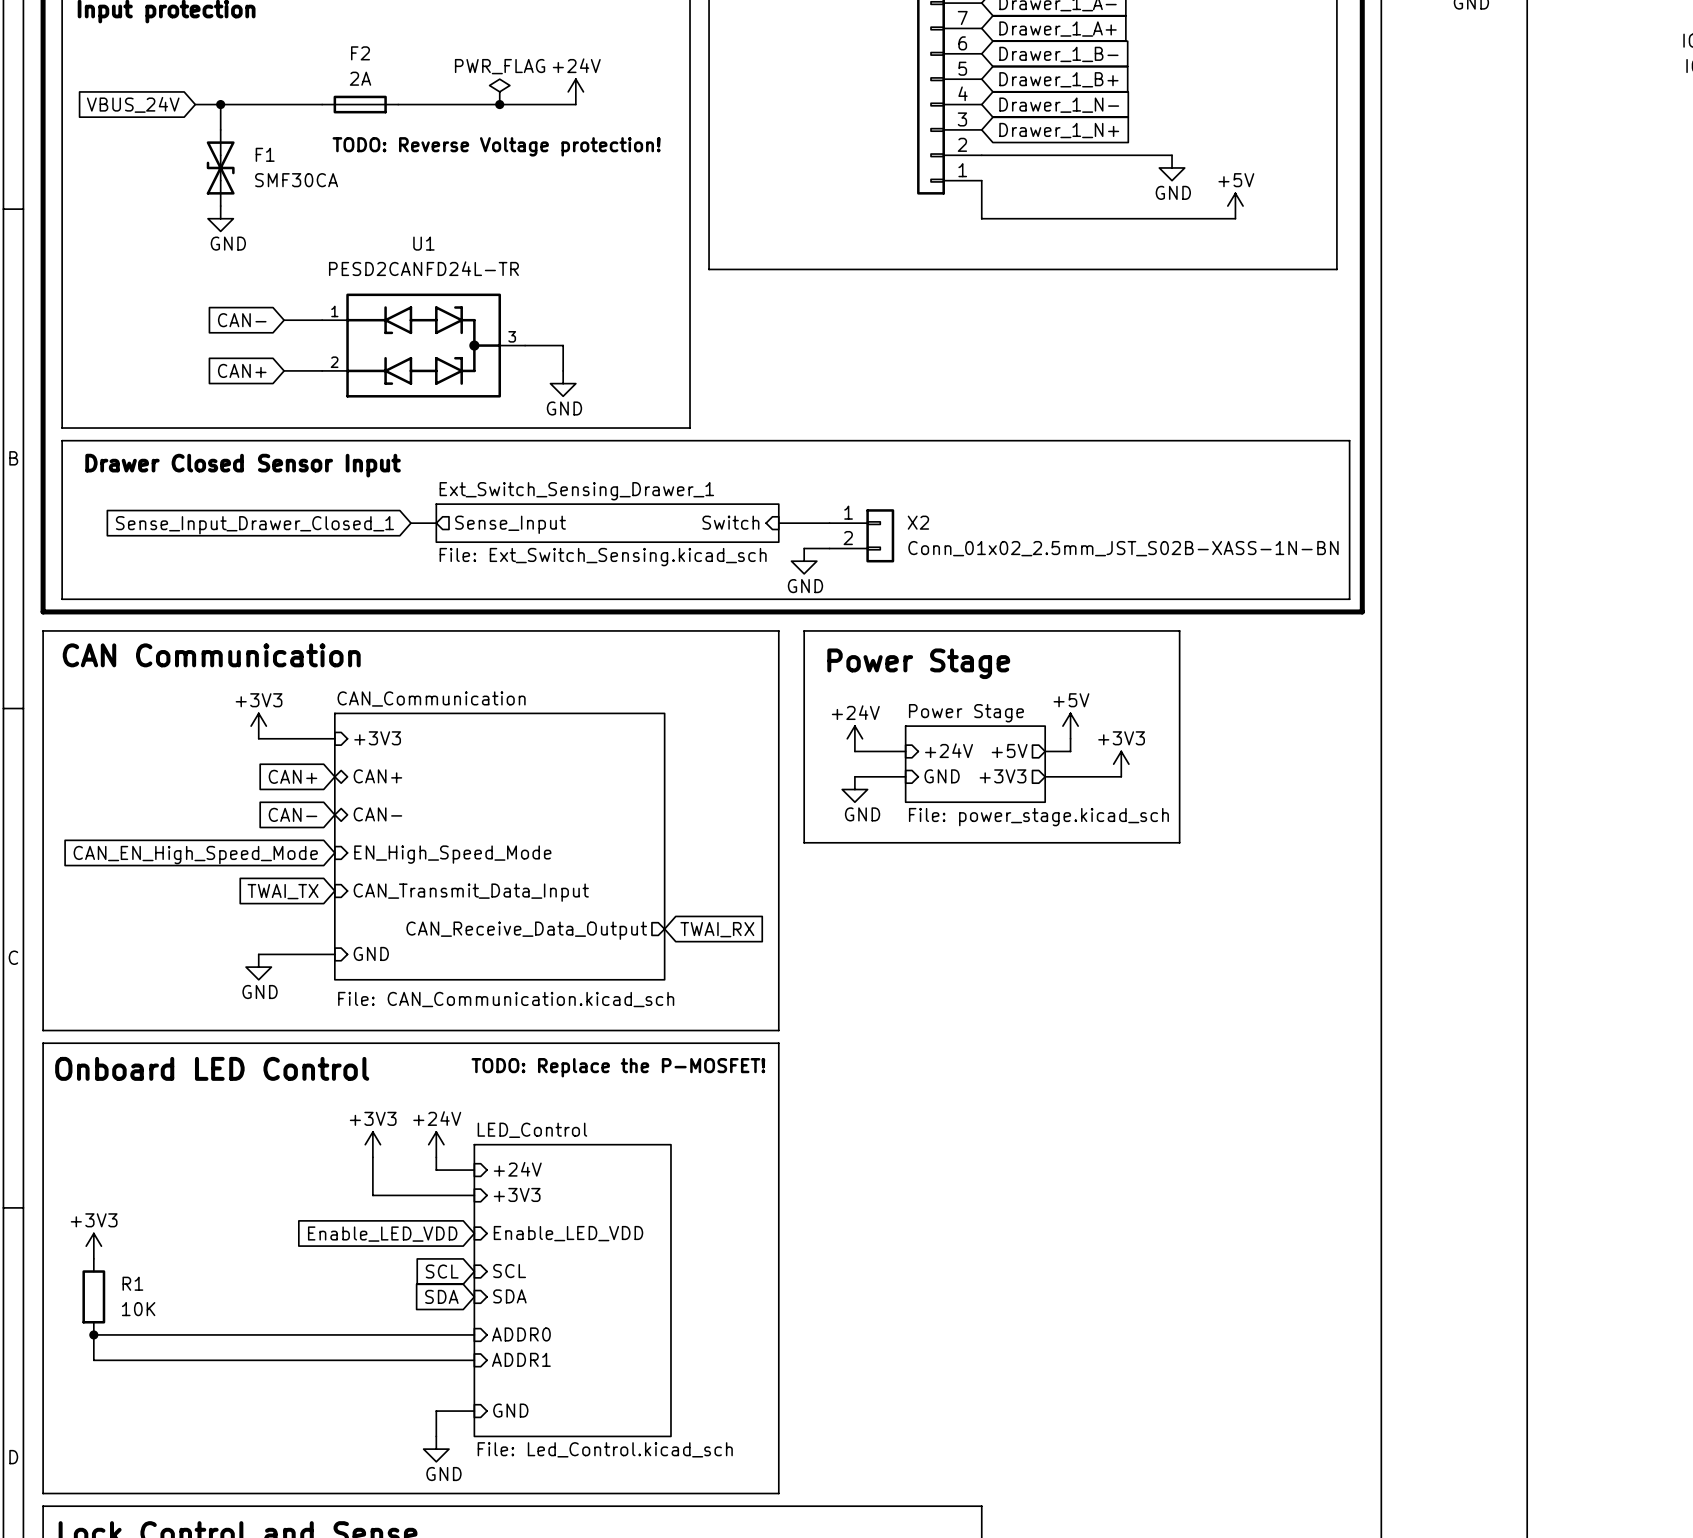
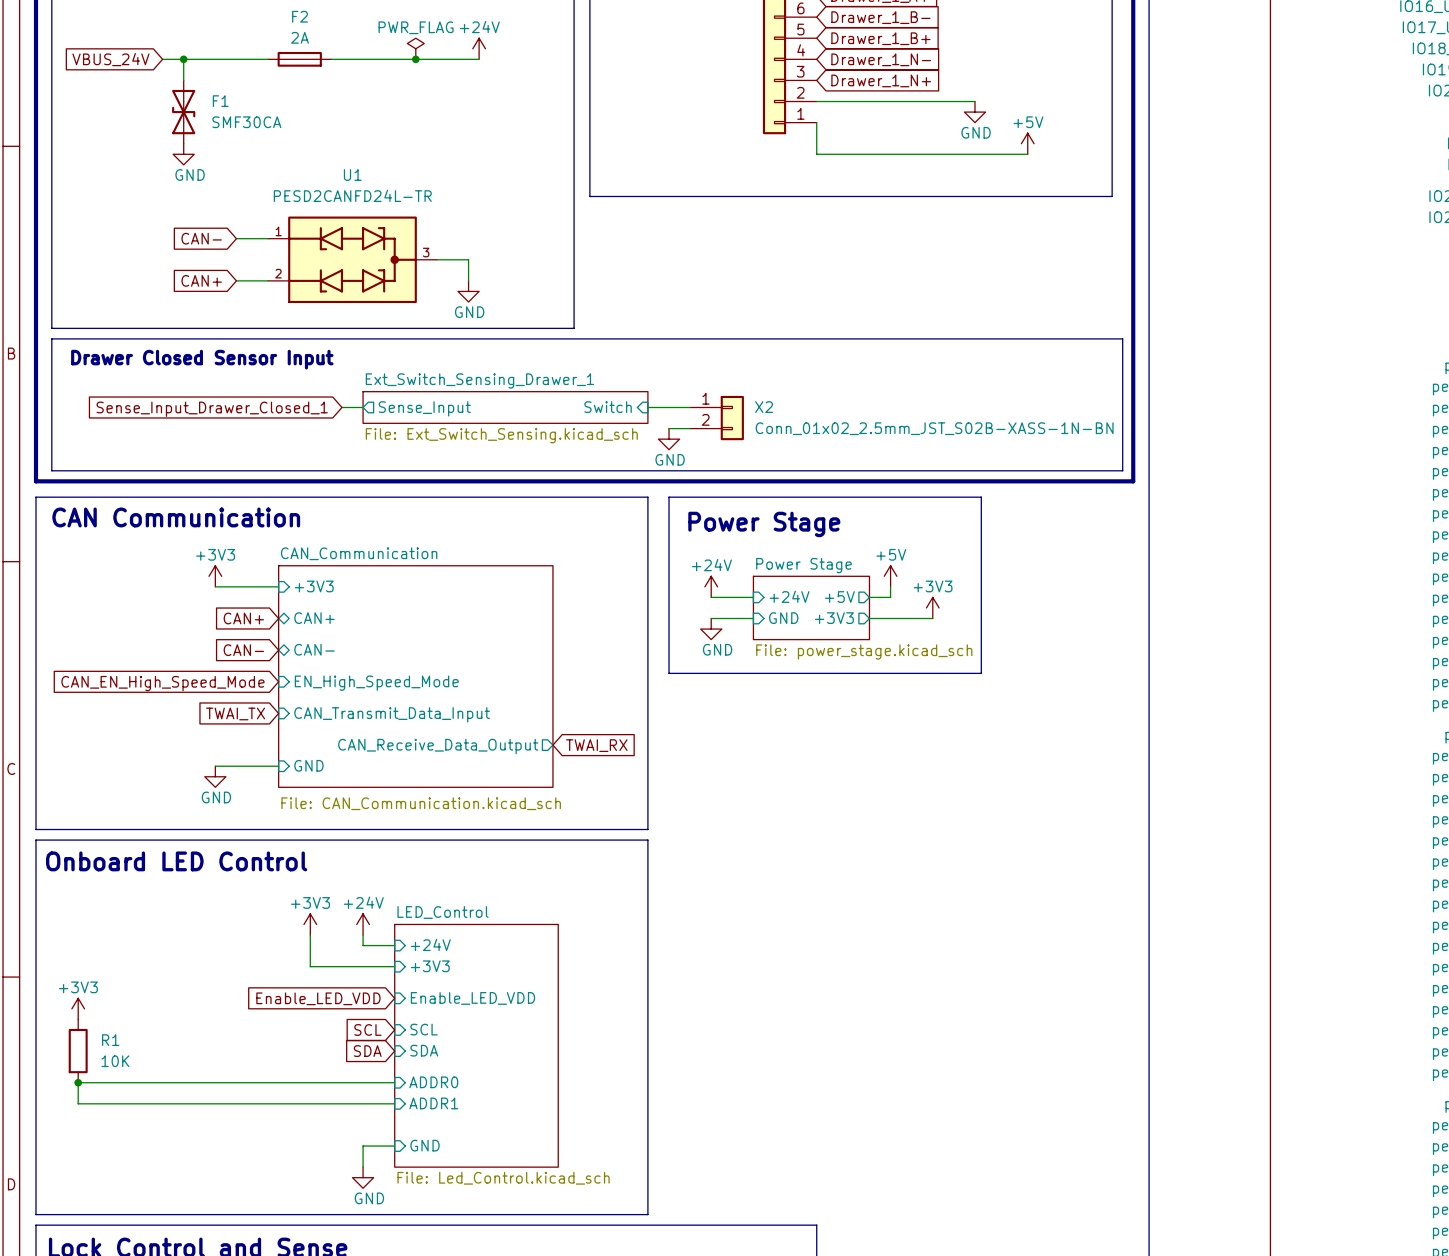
text: TODO: Reverse Voltage protection! (496, 146) -> none
text: TODO: Replace the P-MOSFET! (618, 1067) -> none

